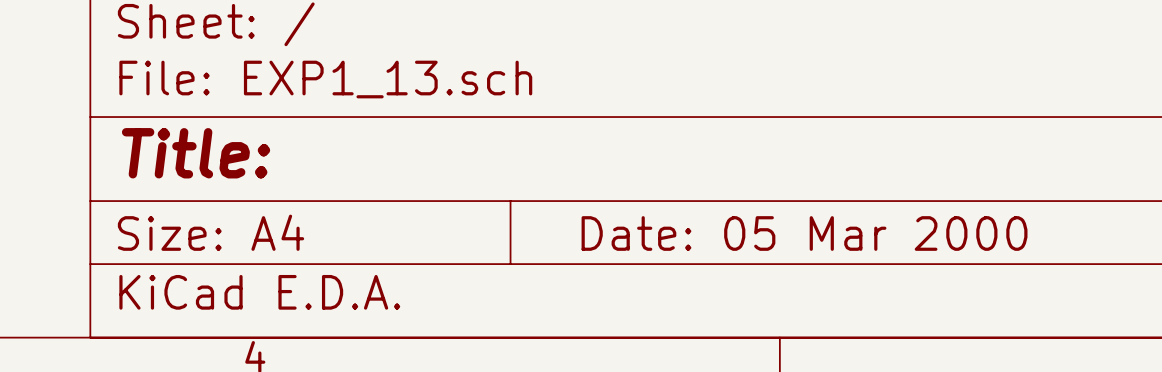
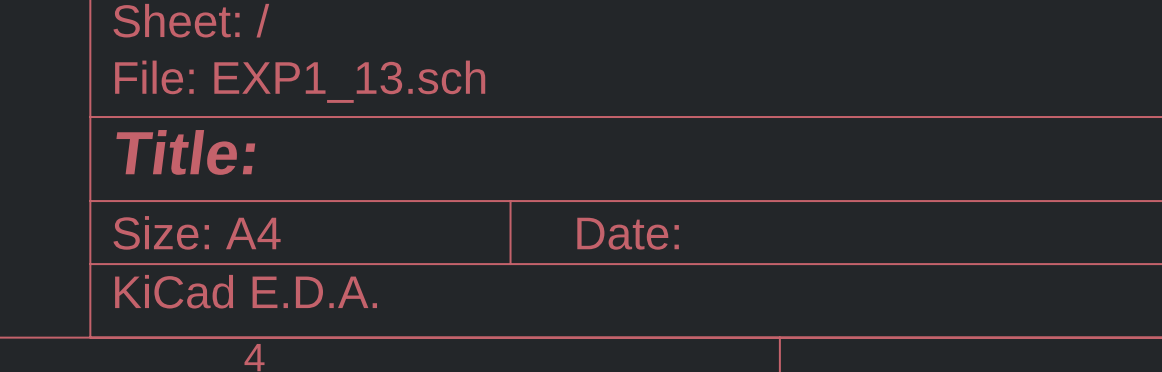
title block: Date: 05 Mar 2000 (804, 233) -> Date: (628, 233)

